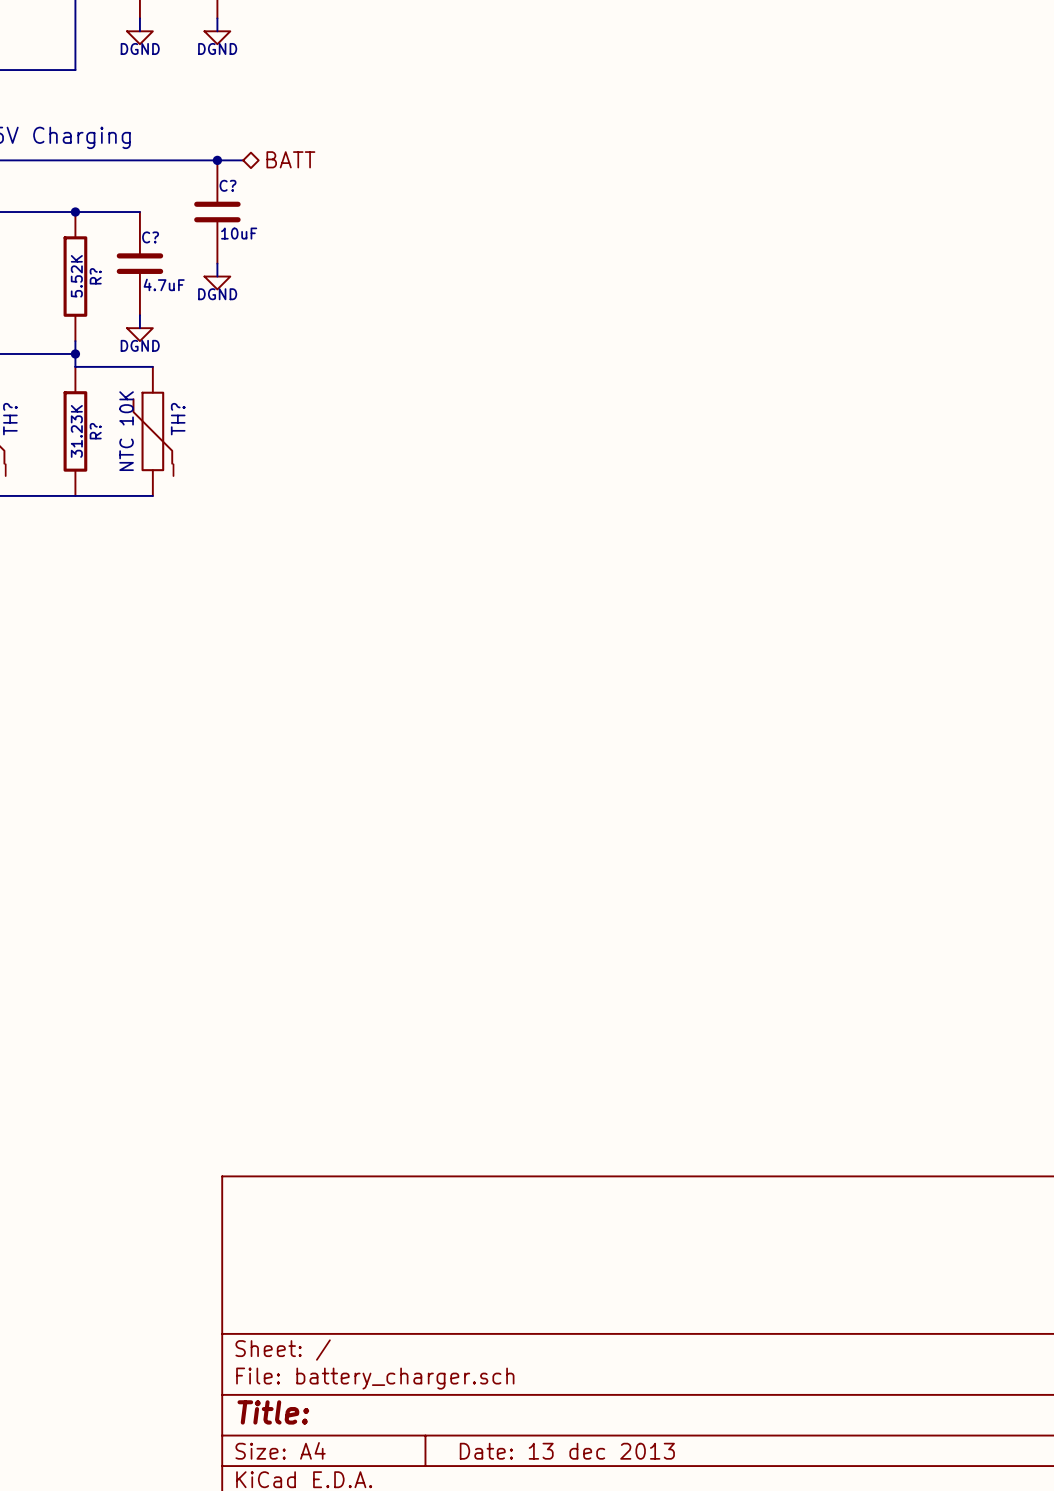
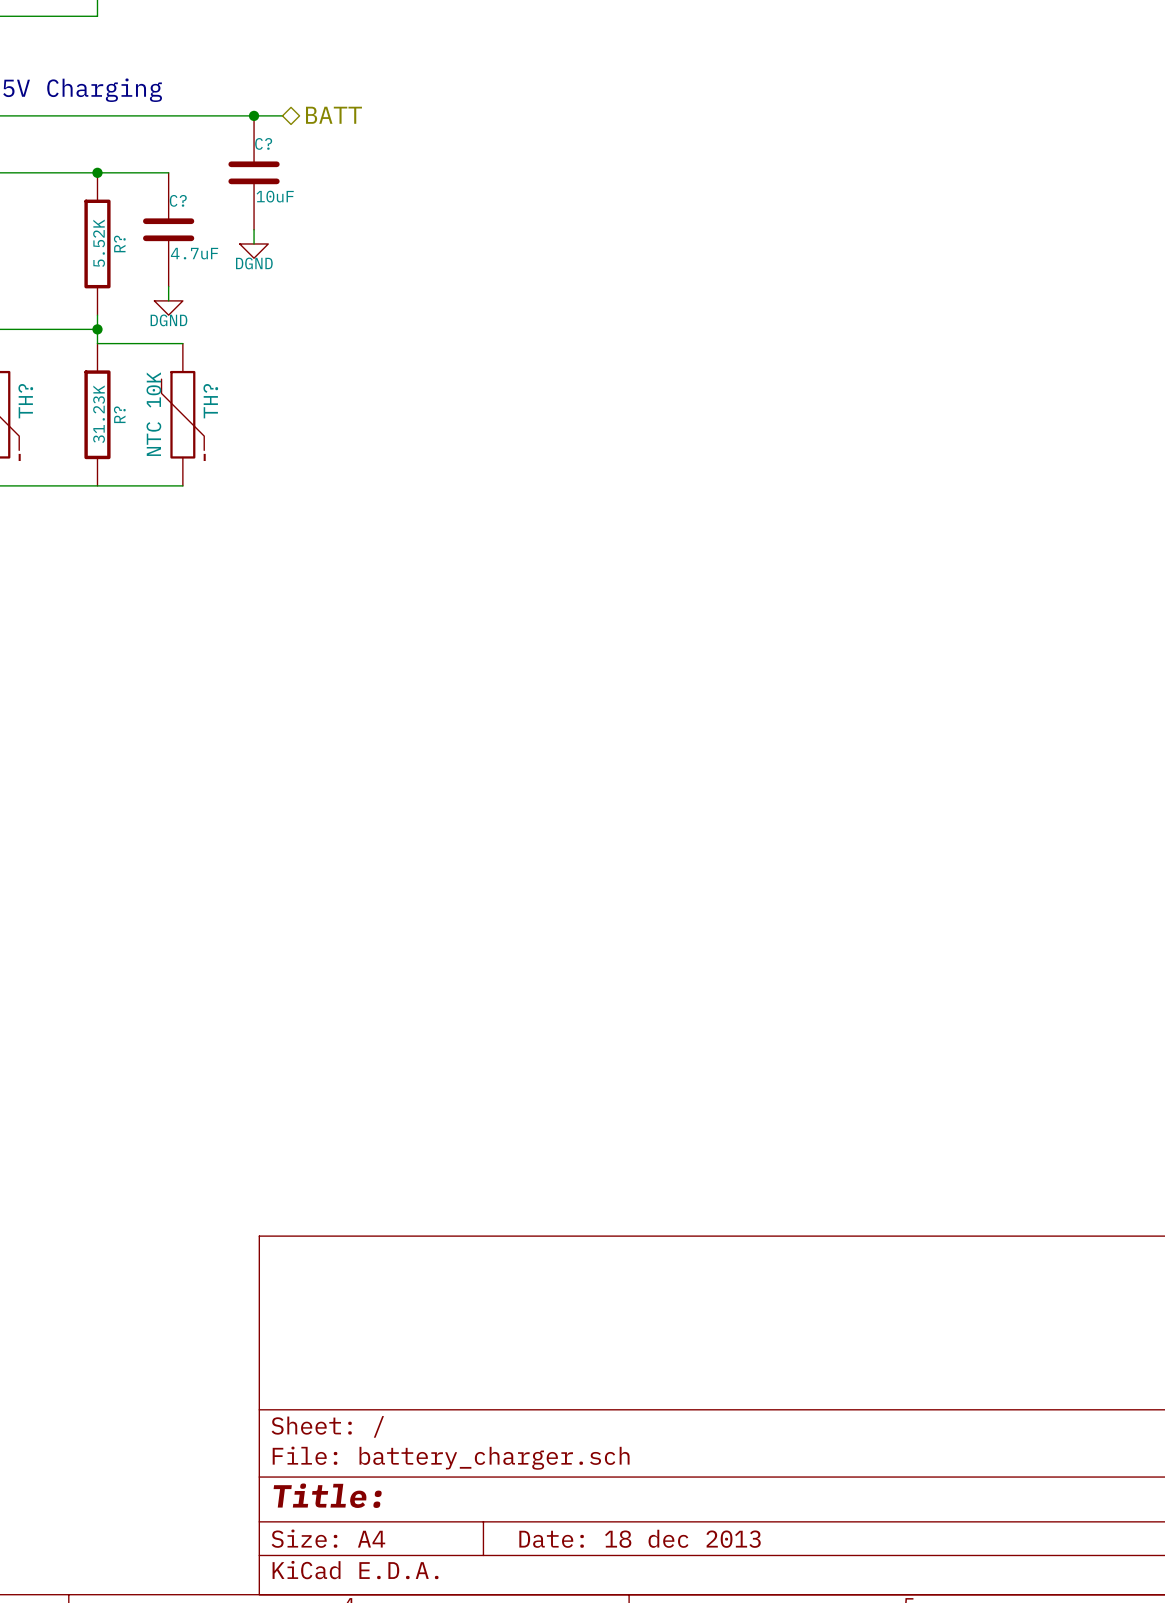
title block: Date: 13 dec 2013 (567, 1451) -> Date: 18 dec 2013 (640, 1538)

